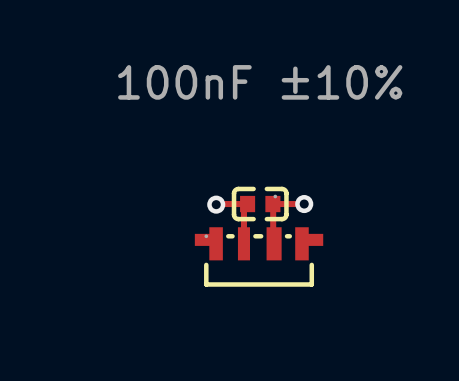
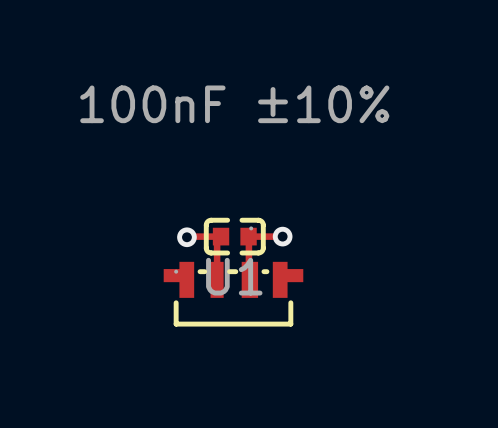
U1 name: none -> U1 (234, 276)

